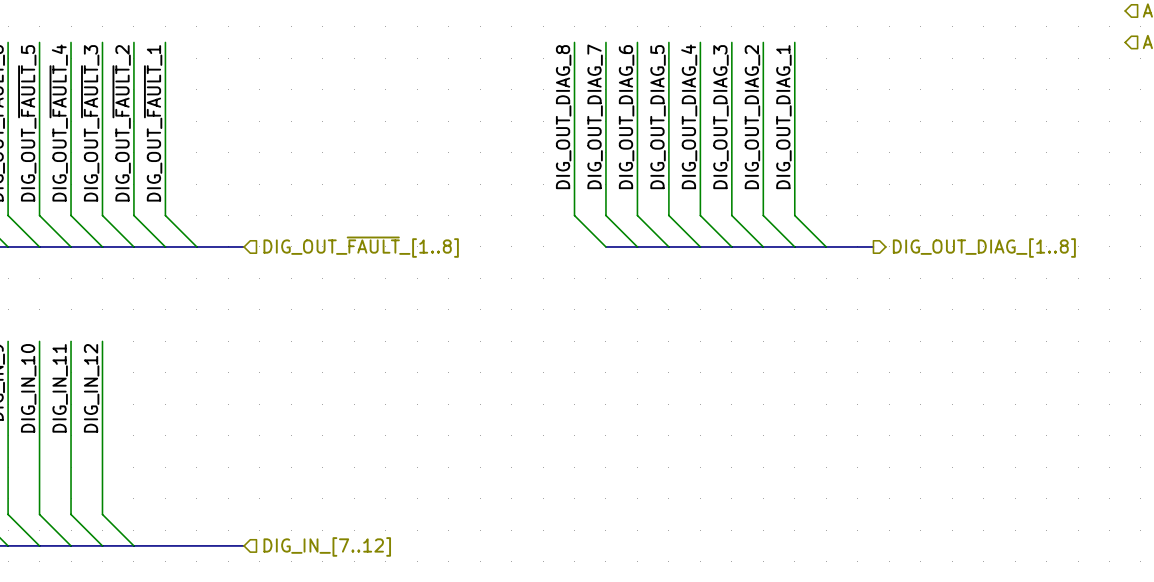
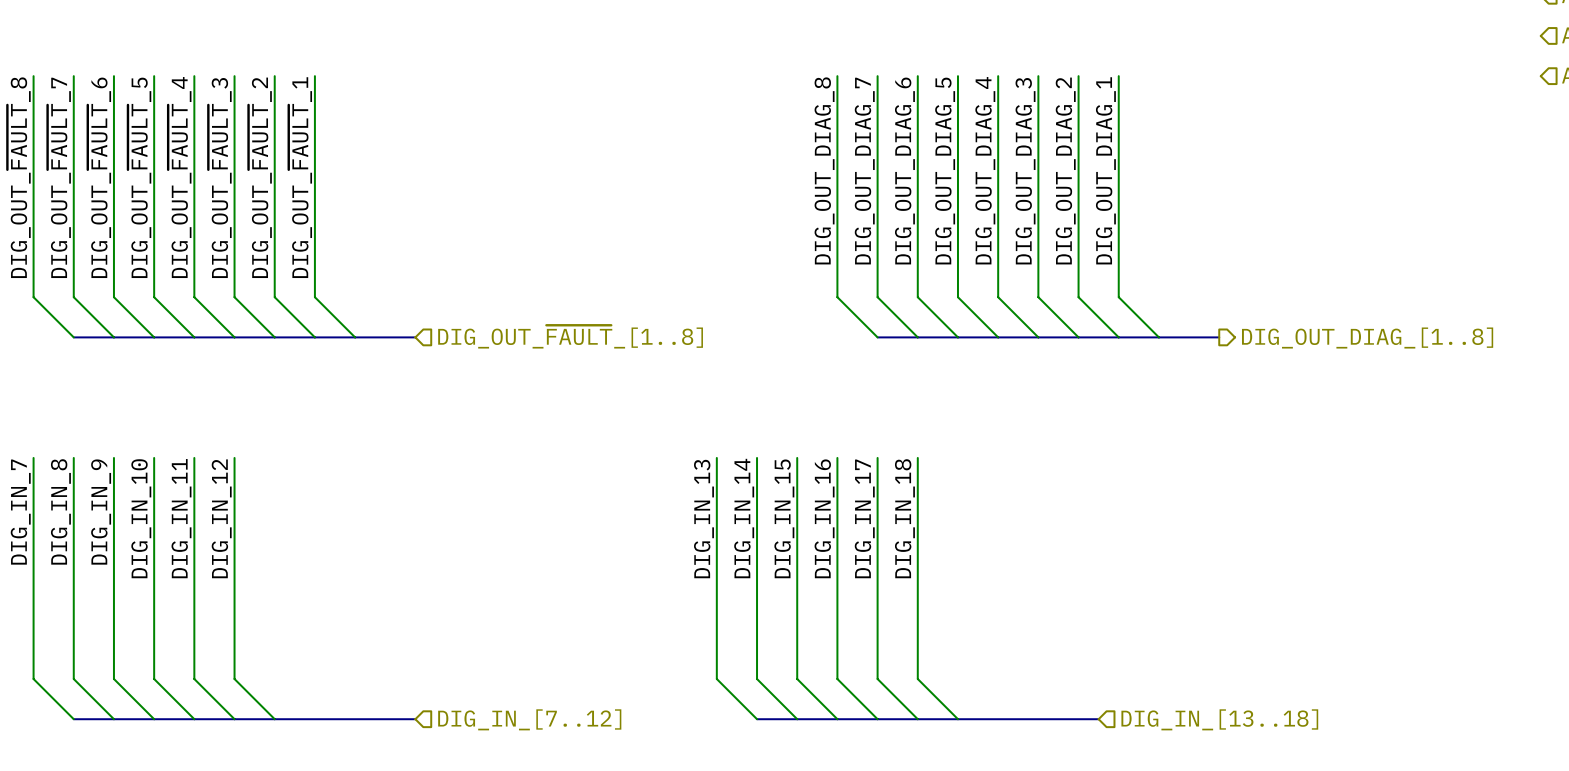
wire: none -> (716, 457) (716, 679) (757, 719)
wire: none -> (757, 457) (757, 679) (797, 719)
wire: none -> (797, 457) (797, 679) (837, 719)
wire: none -> (837, 457) (837, 679) (877, 719)
wire: none -> (877, 457) (877, 679) (917, 719)
wire: none -> (917, 457) (917, 679) (957, 719)
label: none -> DIG_IN_13 (703, 519)
label: none -> DIG_IN_14 (744, 518)
label: none -> DIG_IN_15 (784, 518)
label: none -> DIG_IN_16 (824, 518)
label: none -> DIG_IN_17 (864, 518)
label: none -> DIG_IN_18 (904, 518)
bus: none -> (757, 719) (1098, 719)
hierarchical label: none -> DIG_IN_[13..18] (1219, 719)

